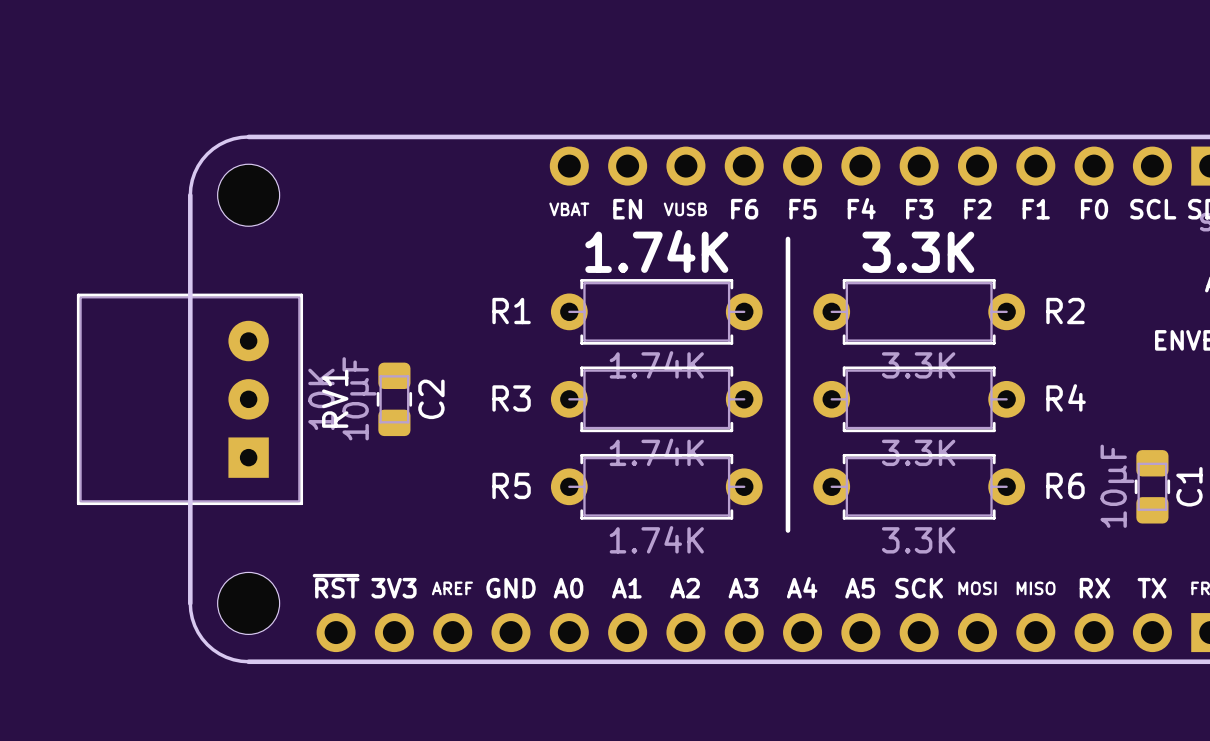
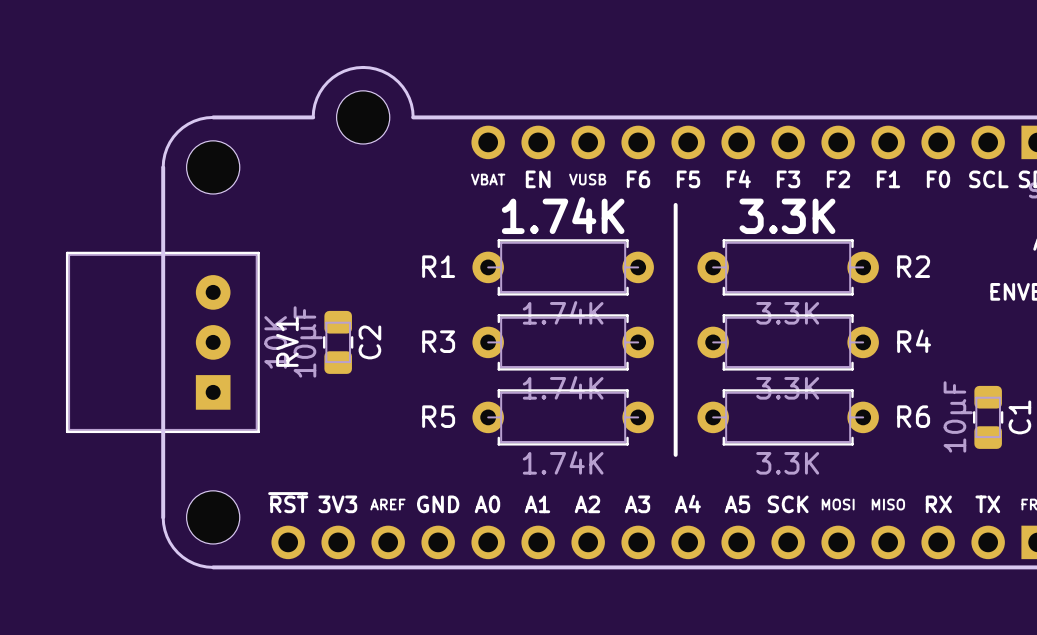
board edge: (365, 136) (481, 136) -> (313, 117) (316, 98) (327, 82) (344, 71) (363, 67) (382, 71) (398, 82) (409, 98) (413, 117)
part: none -> (363, 117)

